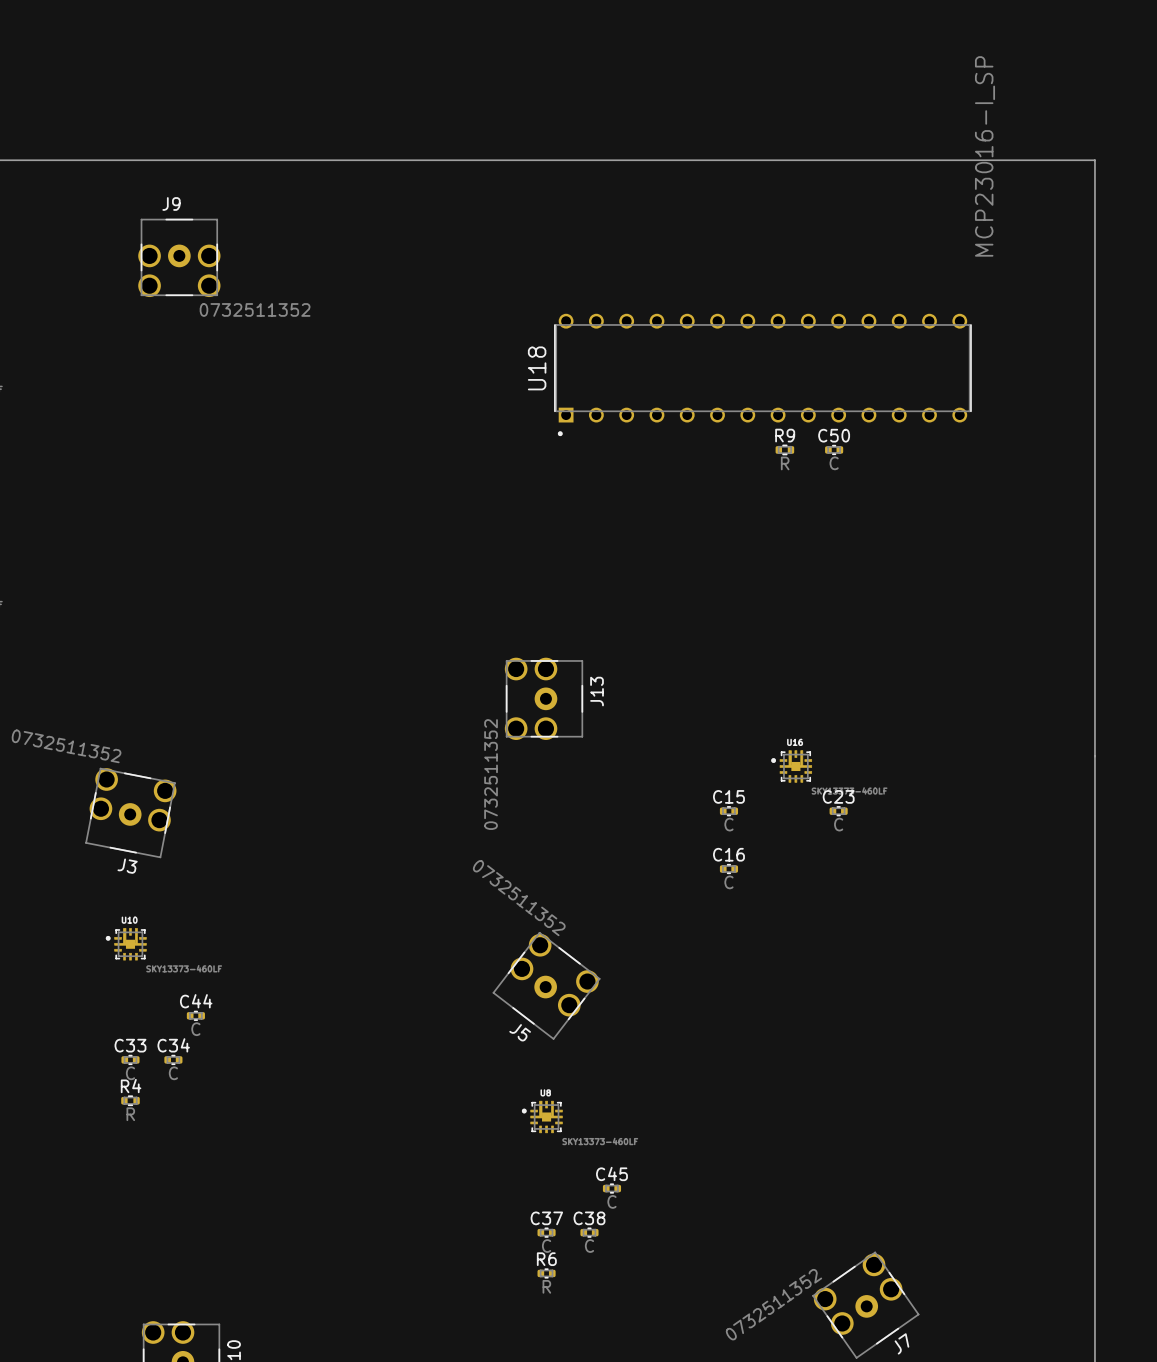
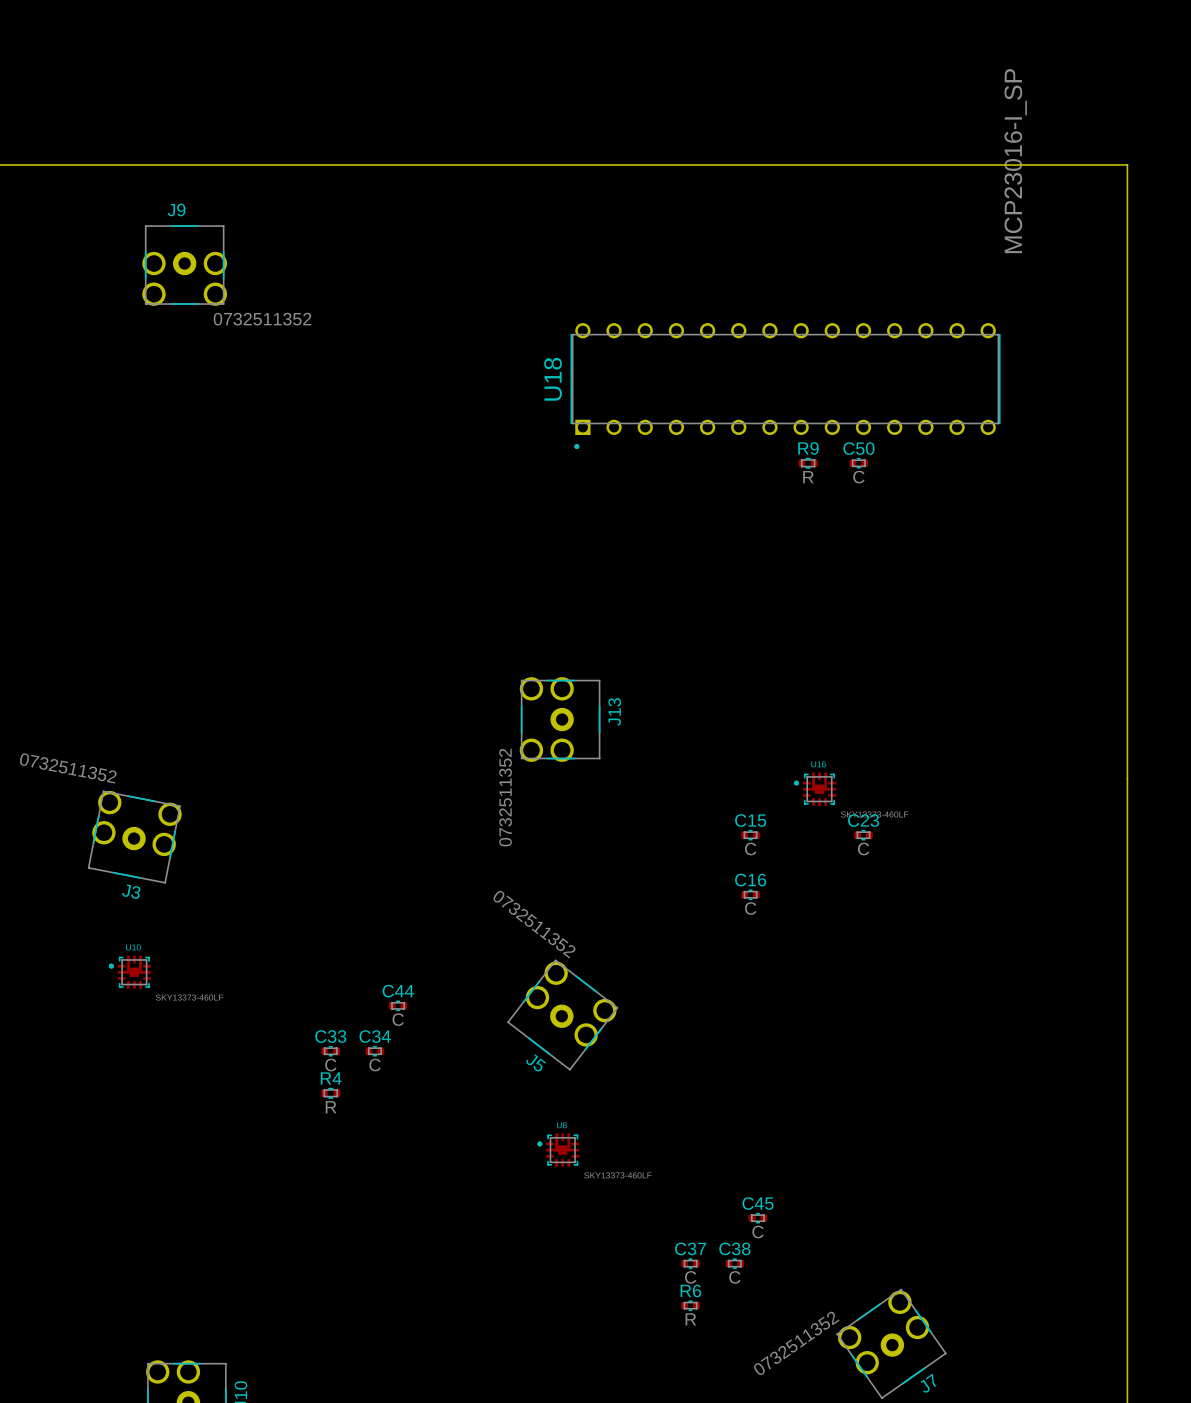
C44 position: (195, 1015) -> (398, 1005)
C33 position: (130, 1059) -> (330, 1051)
C34 position: (173, 1059) -> (374, 1051)
R4 position: (130, 1100) -> (330, 1093)
C45 position: (611, 1188) -> (757, 1218)
C37 position: (546, 1232) -> (690, 1263)
C38 position: (589, 1232) -> (734, 1263)
R6 position: (546, 1273) -> (690, 1305)

